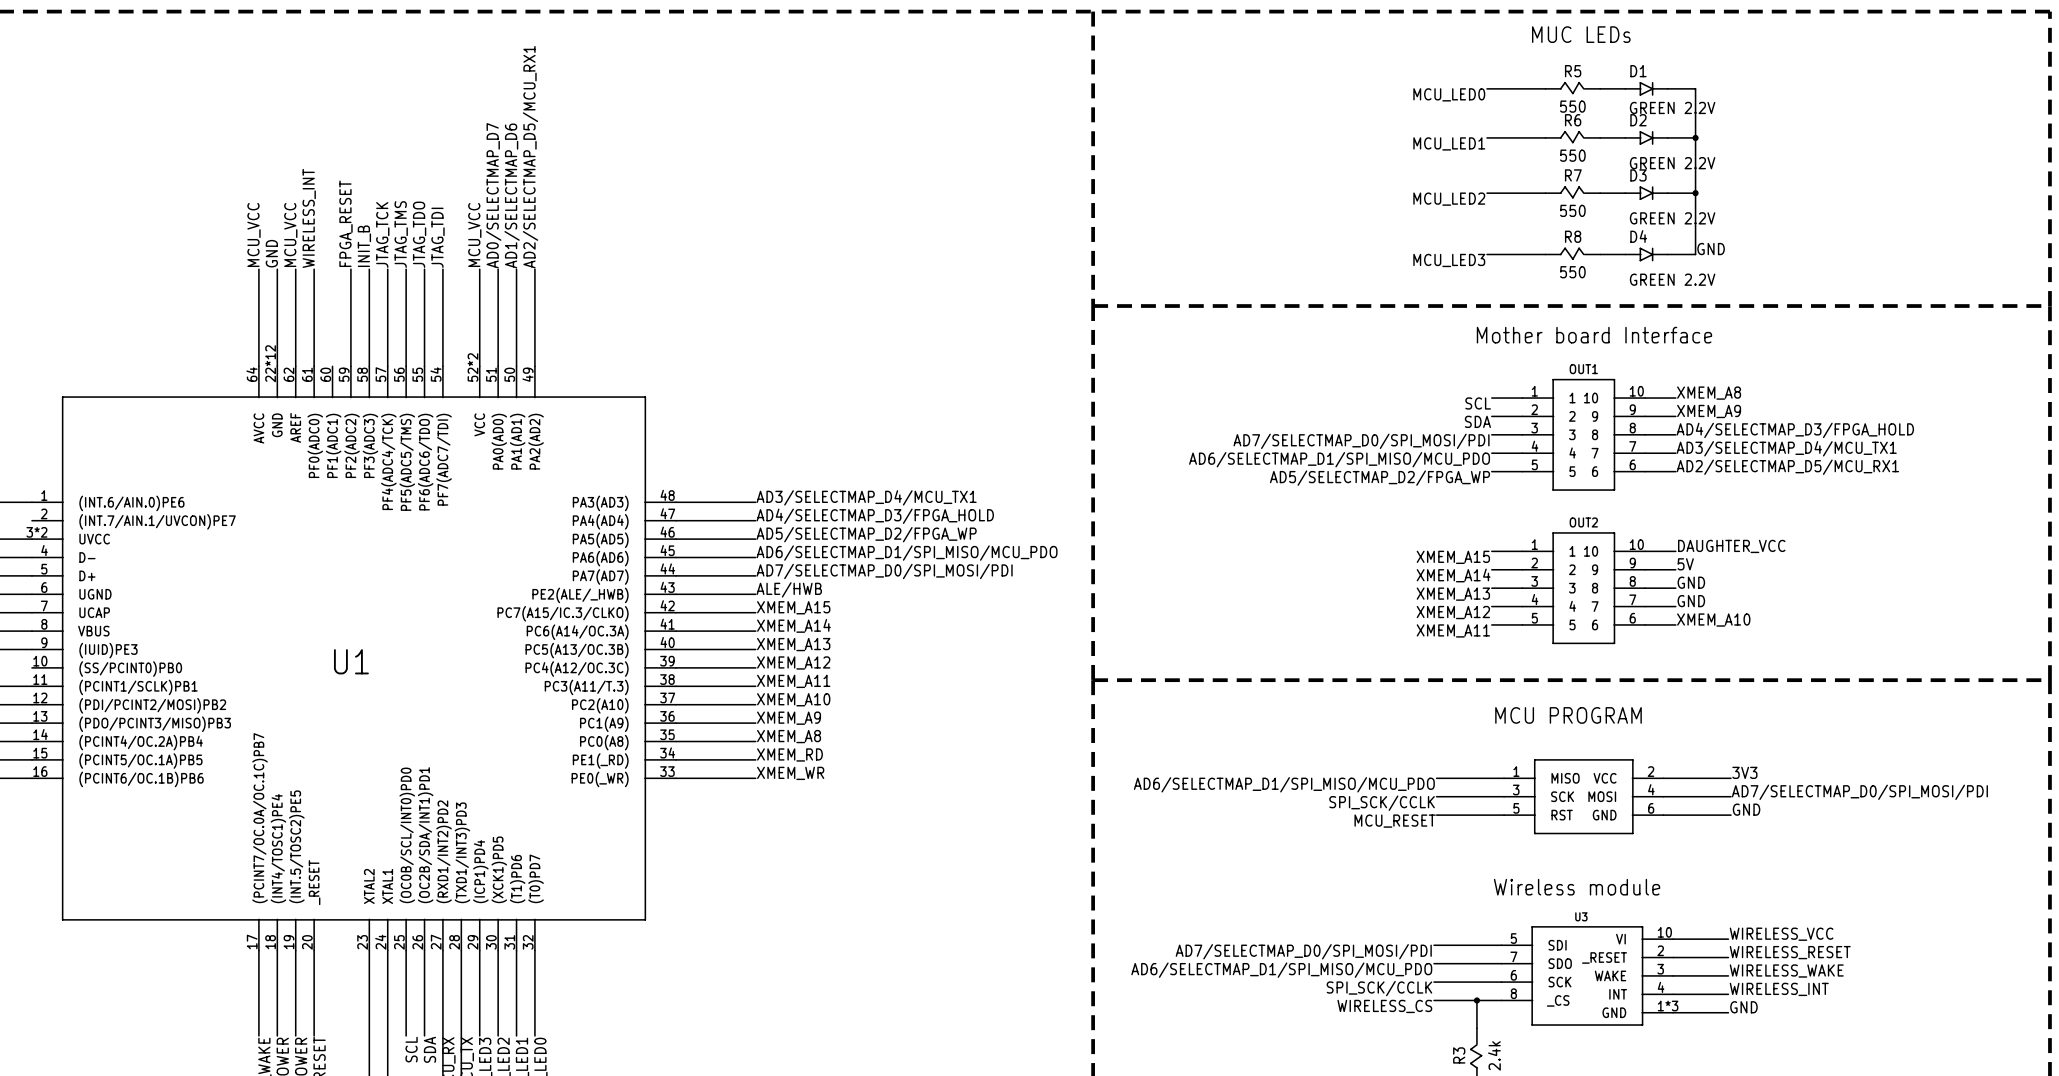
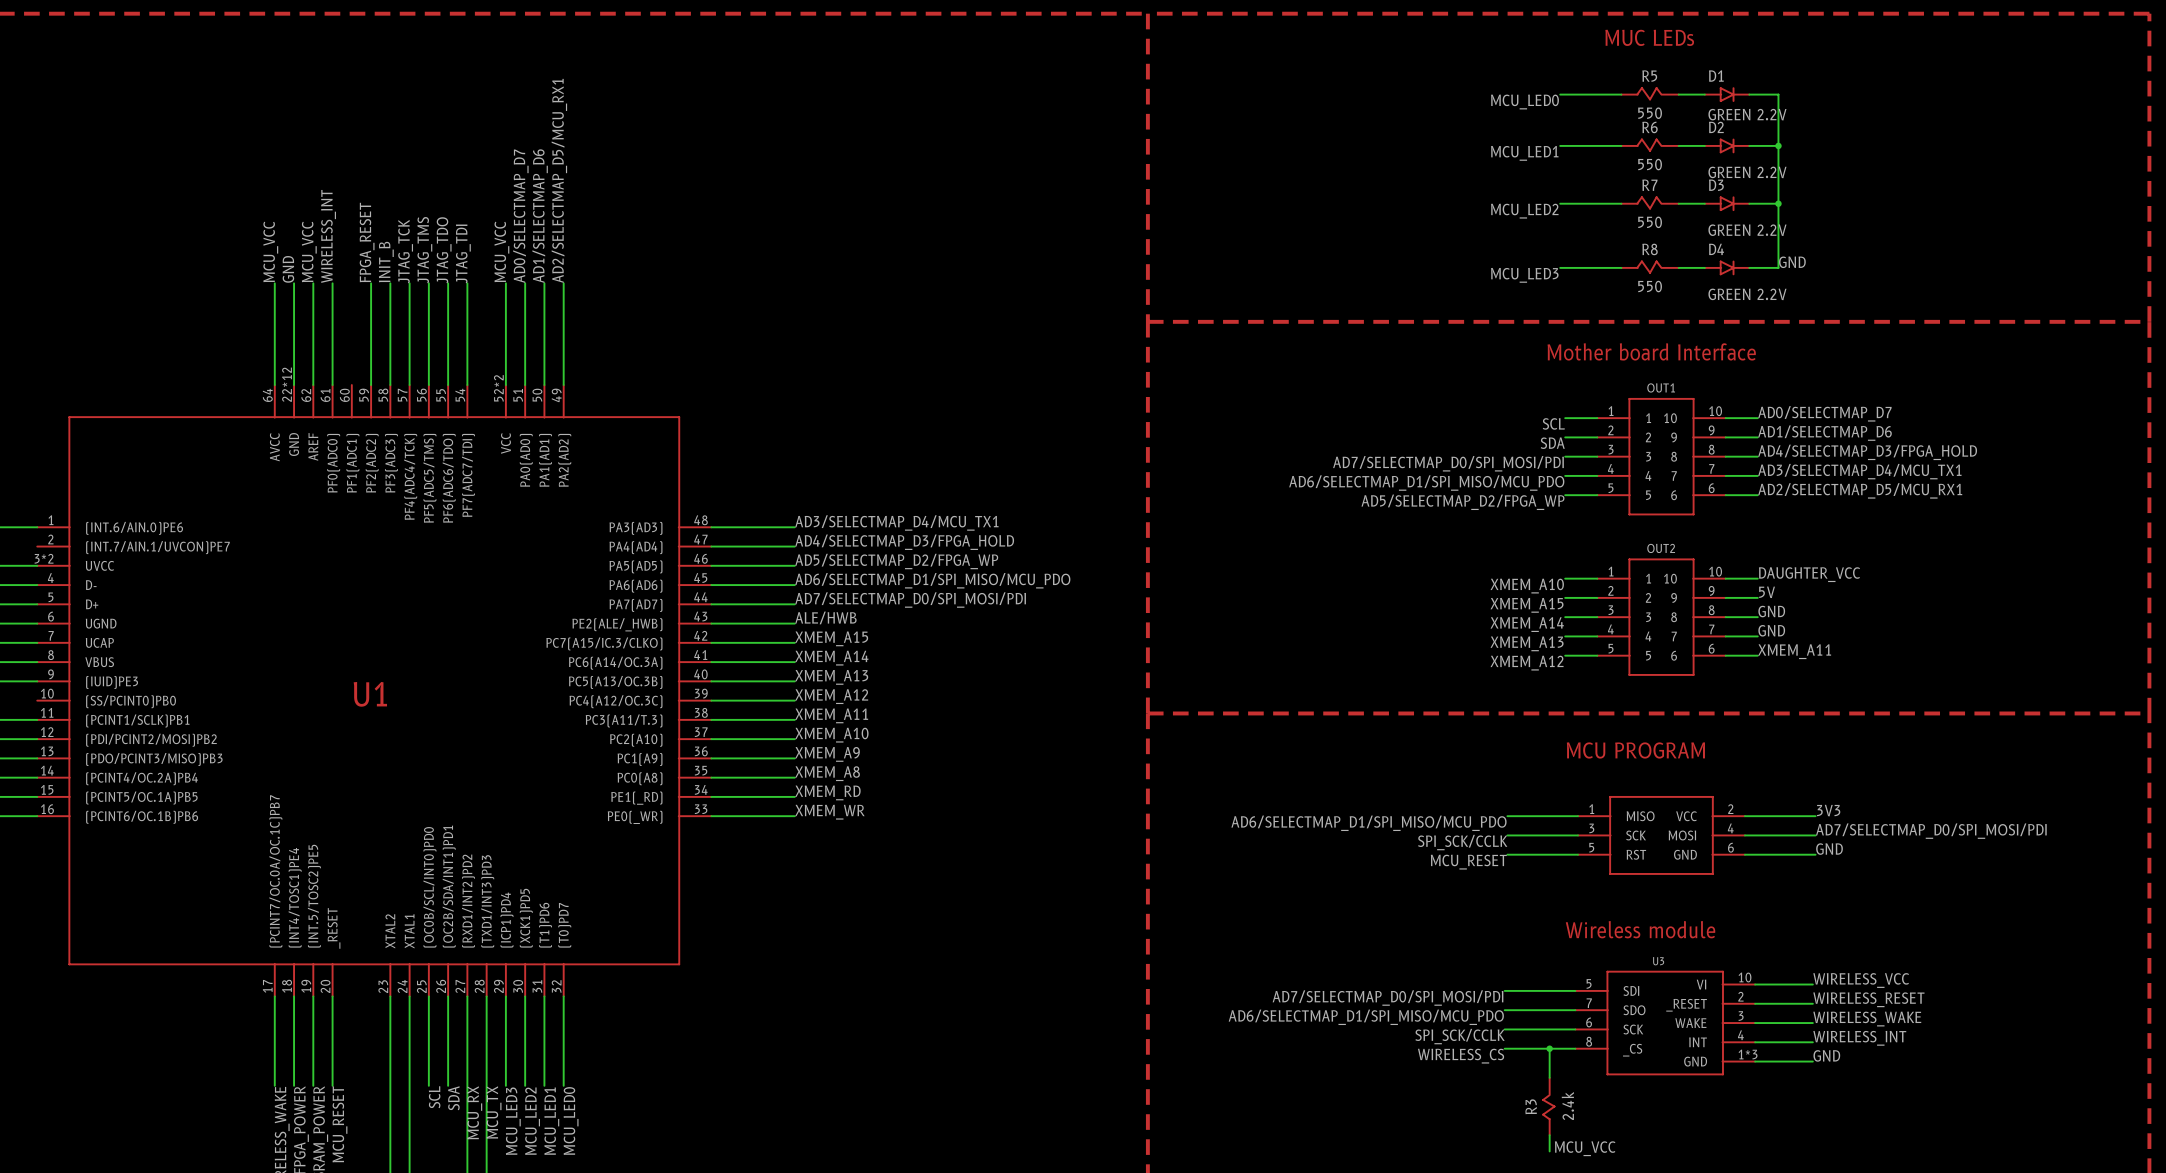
label: XMEM_A8 (1709, 393) -> AD0/SELECTMAP_D7 (1824, 413)
label: XMEM_A9 (1709, 411) -> AD1/SELECTMAP_D6 (1825, 433)
label: XMEM_A15 (1453, 557) -> XMEM_A10 (1527, 586)
label: XMEM_A14 (1453, 575) -> XMEM_A15 (1527, 605)
label: XMEM_A13 (1453, 594) -> XMEM_A14 (1527, 624)
label: XMEM_A12 (1453, 612) -> XMEM_A13 (1527, 643)
label: XMEM_A10 (1713, 620) -> XMEM_A11 (1794, 651)
label: XMEM_A11 (1453, 630) -> XMEM_A12 (1527, 663)

